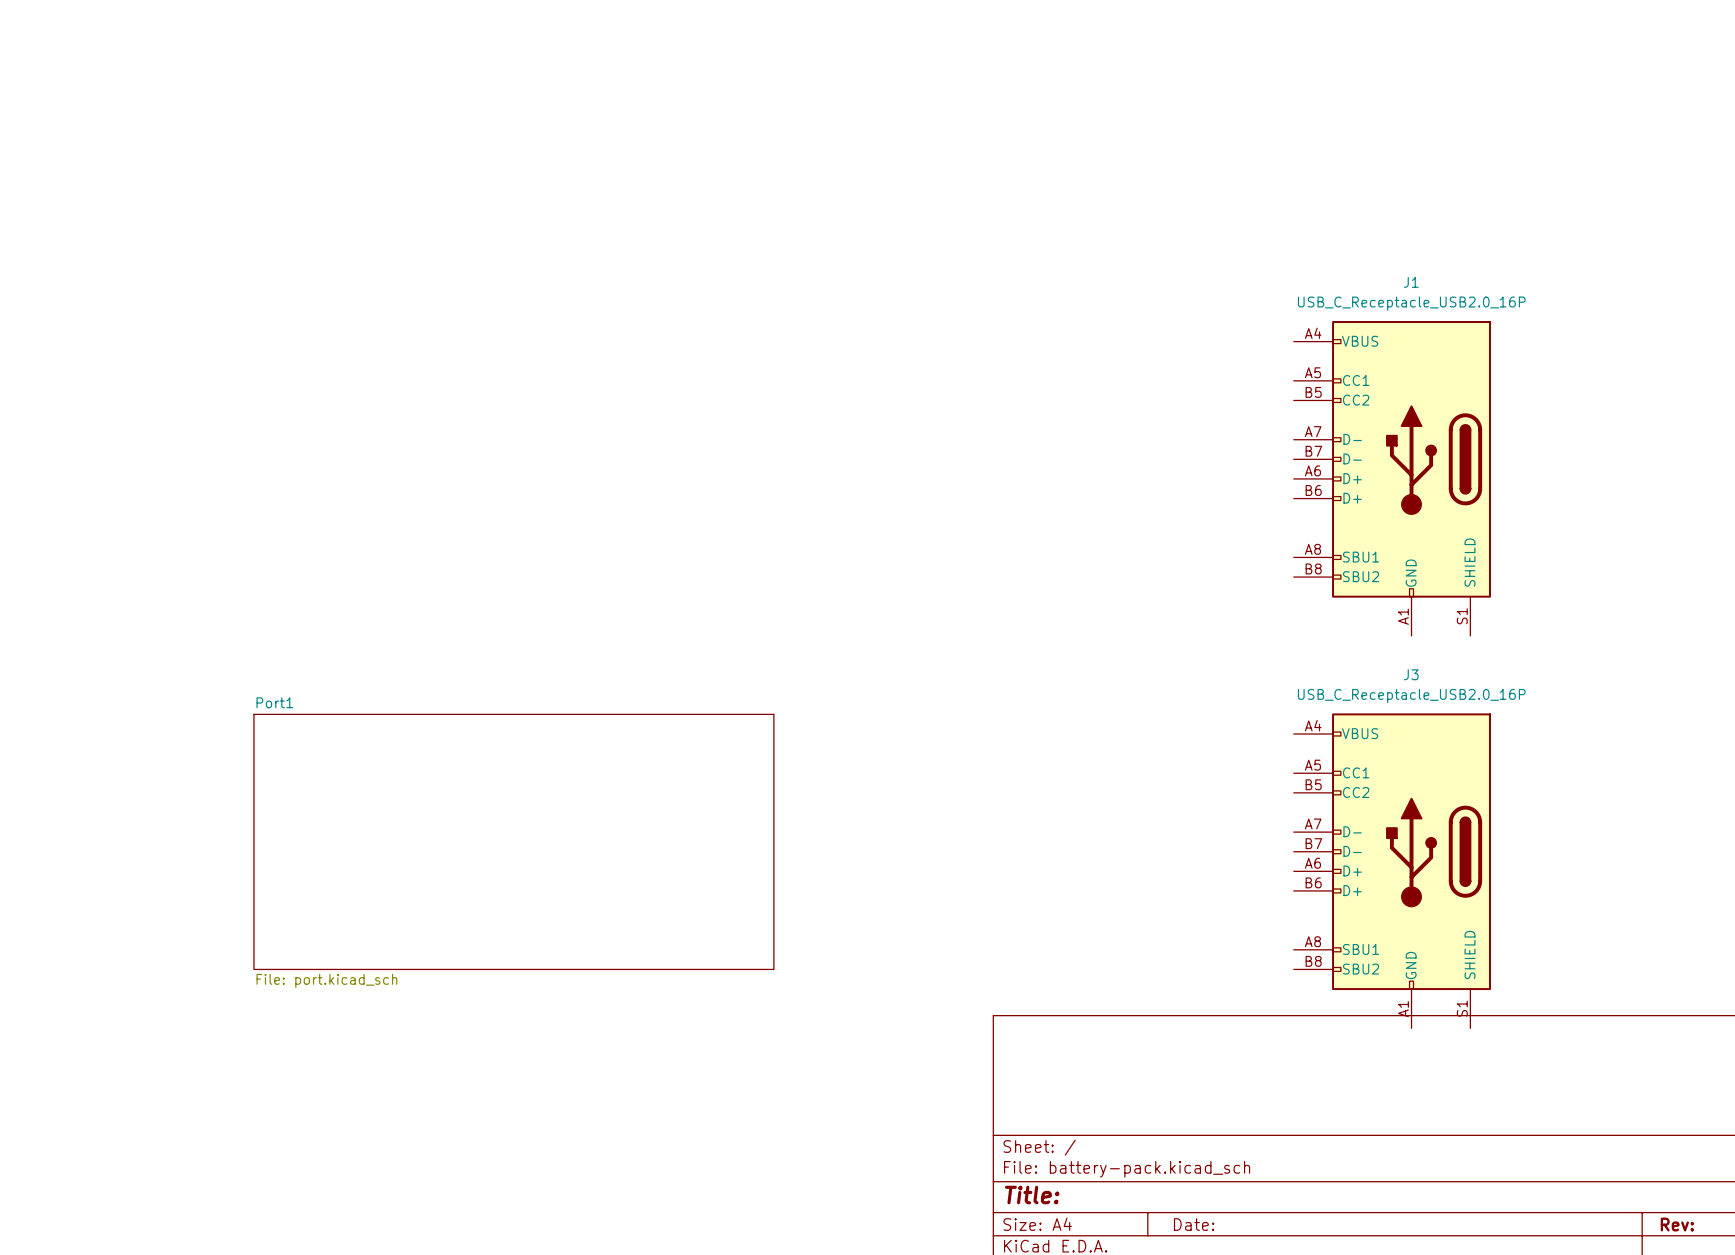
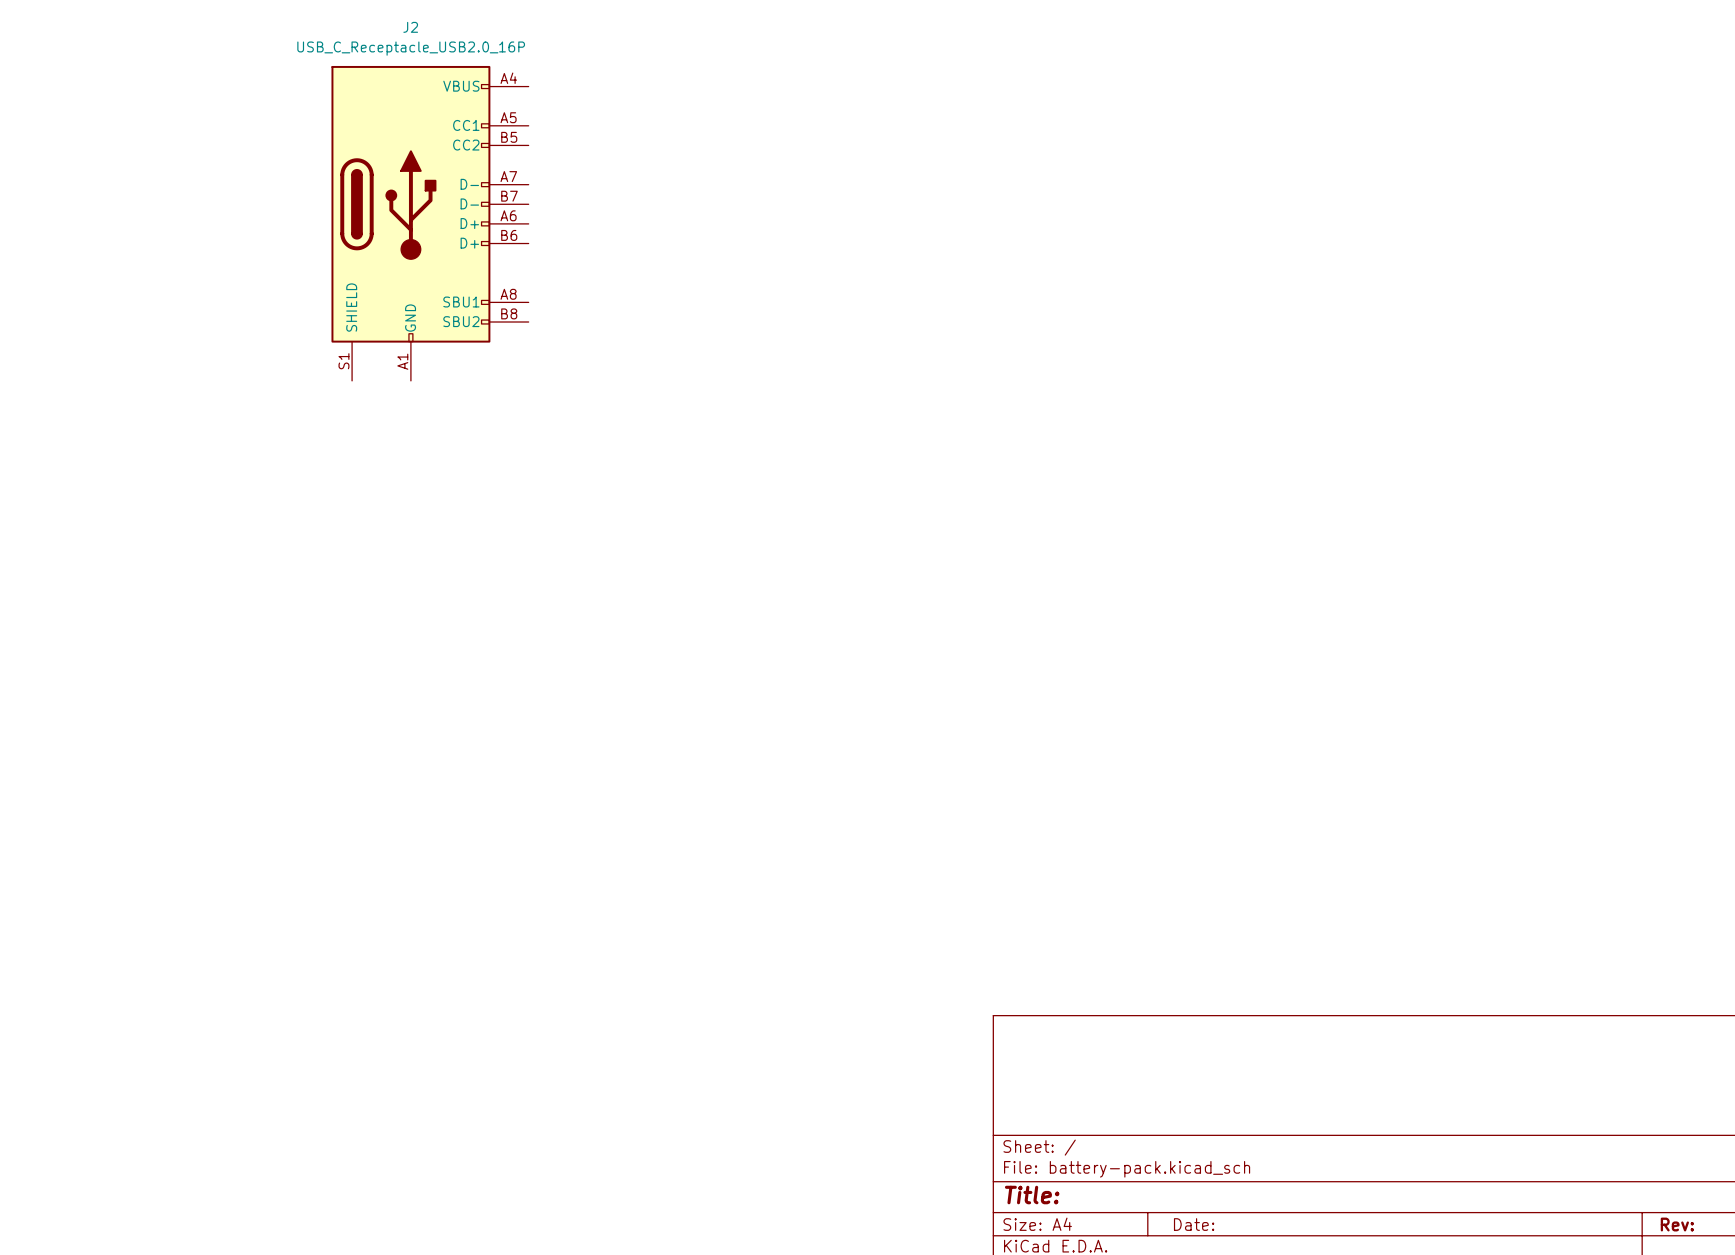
J2: none -> USB_C_Receptacle_USB2.0_16P (430, 223)
J1: USB_C_Receptacle_USB2.0_16P (1392, 478) -> none
sheet Port1: File: port.kicad_sch (513, 841) -> none
J3: USB_C_Receptacle_USB2.0_16P (1392, 870) -> none

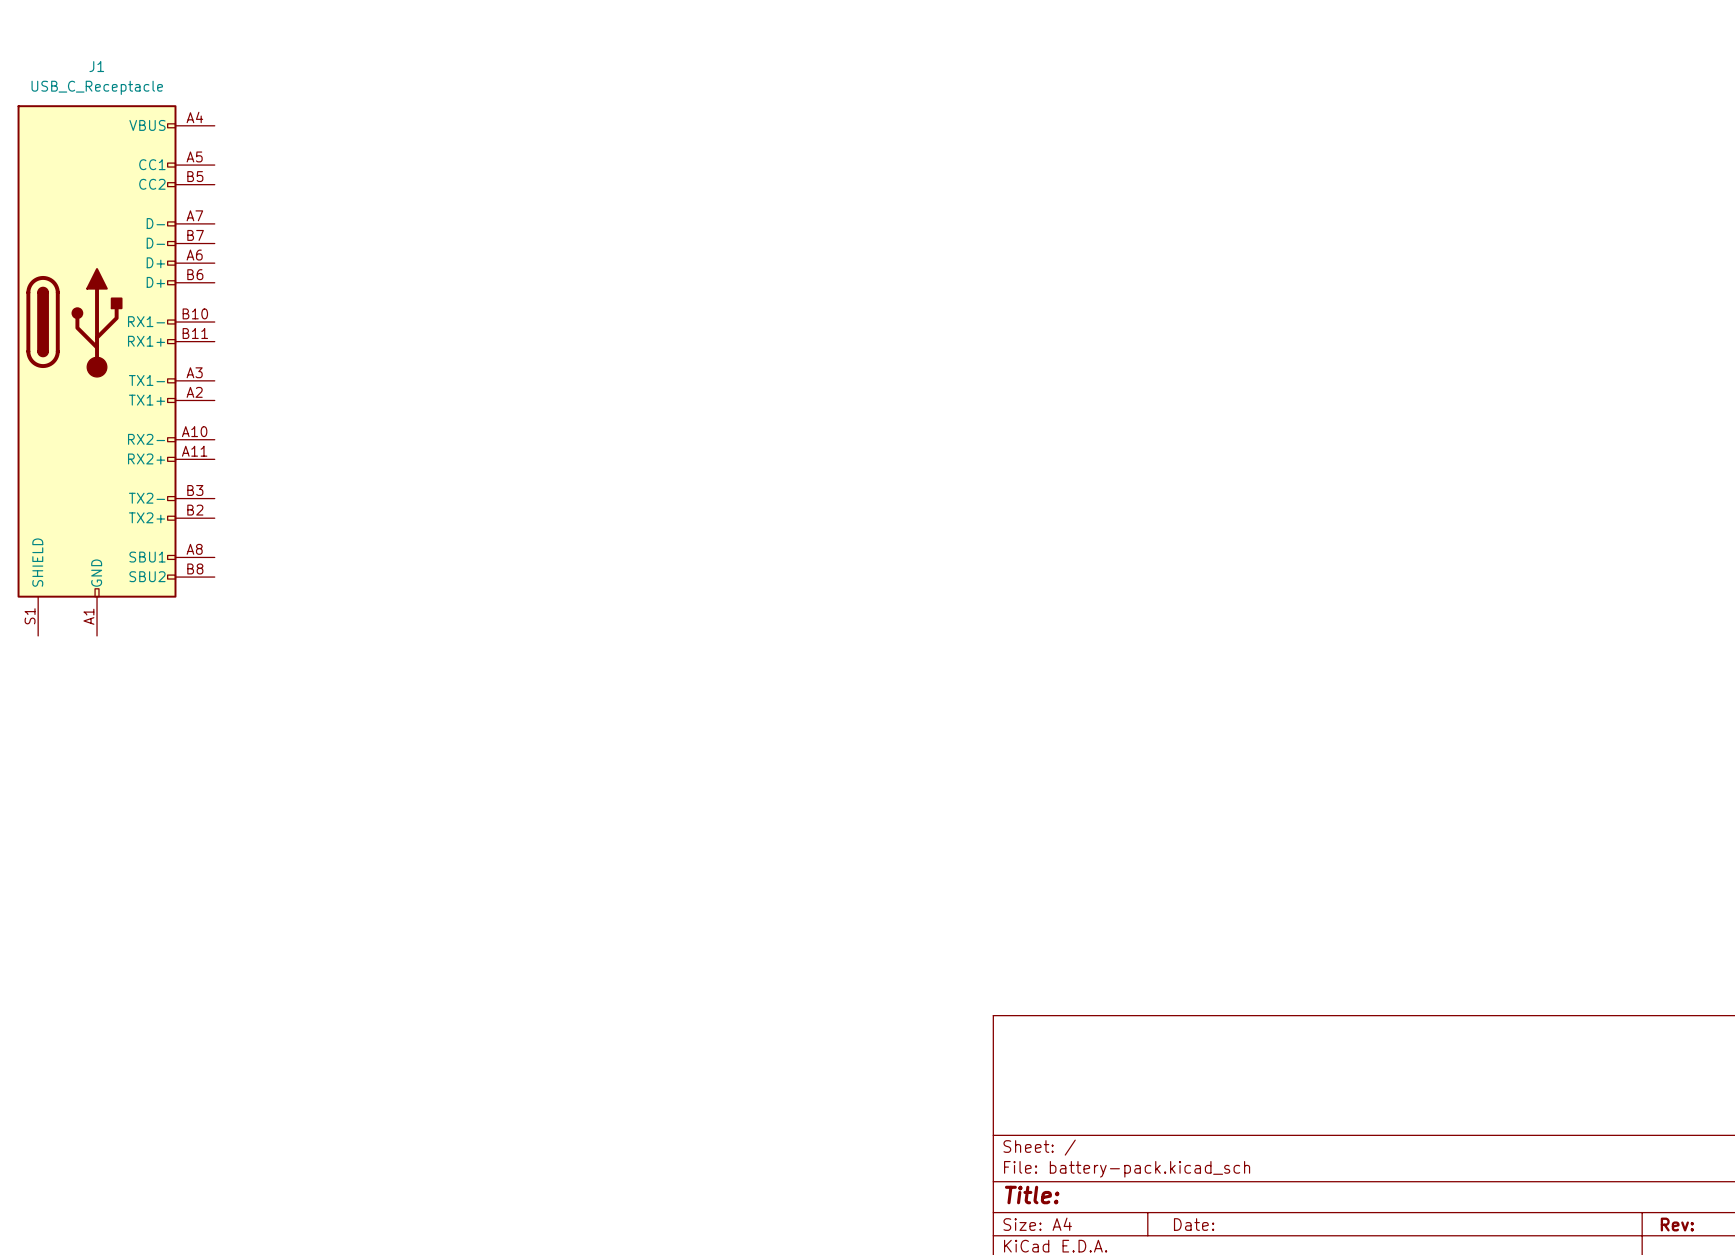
J2: USB_C_Receptacle_USB2.0_16P (430, 223) -> none
J1: none -> USB_C_Receptacle (116, 370)

